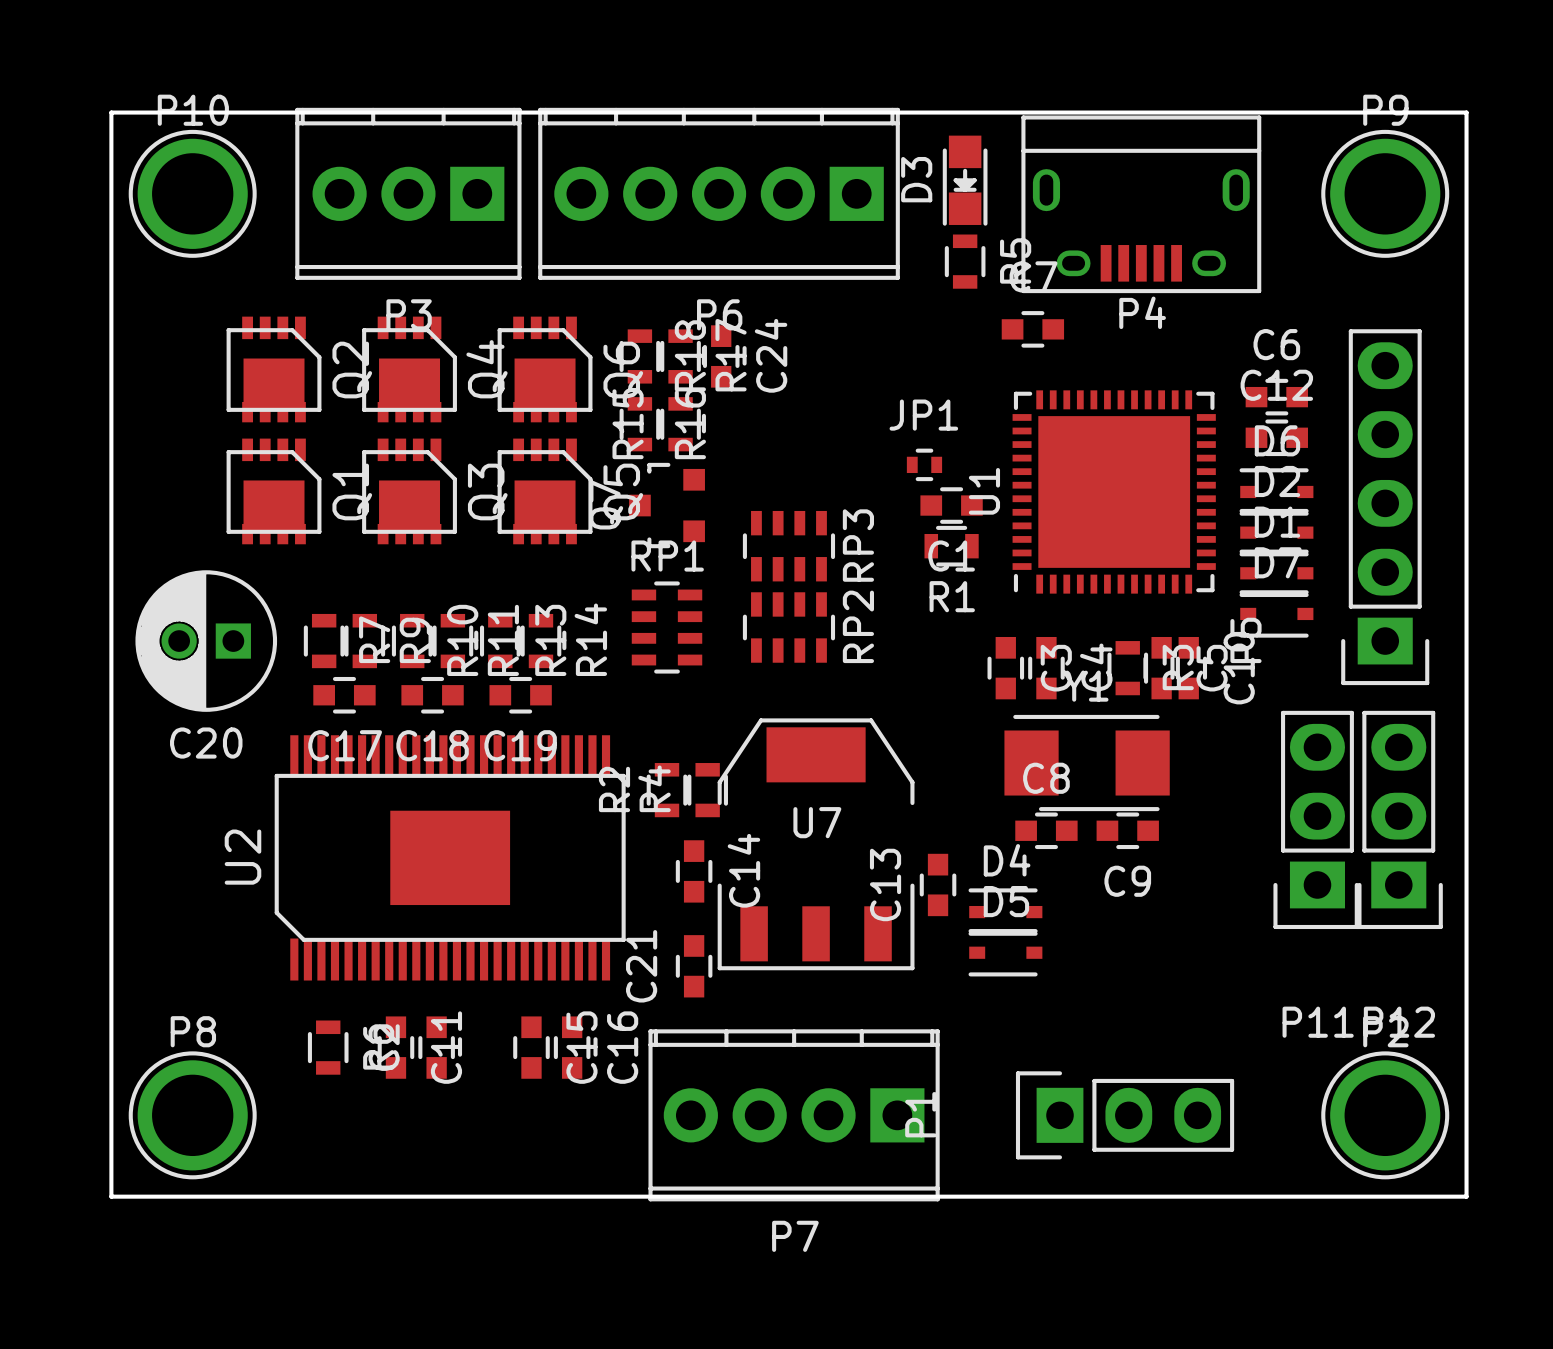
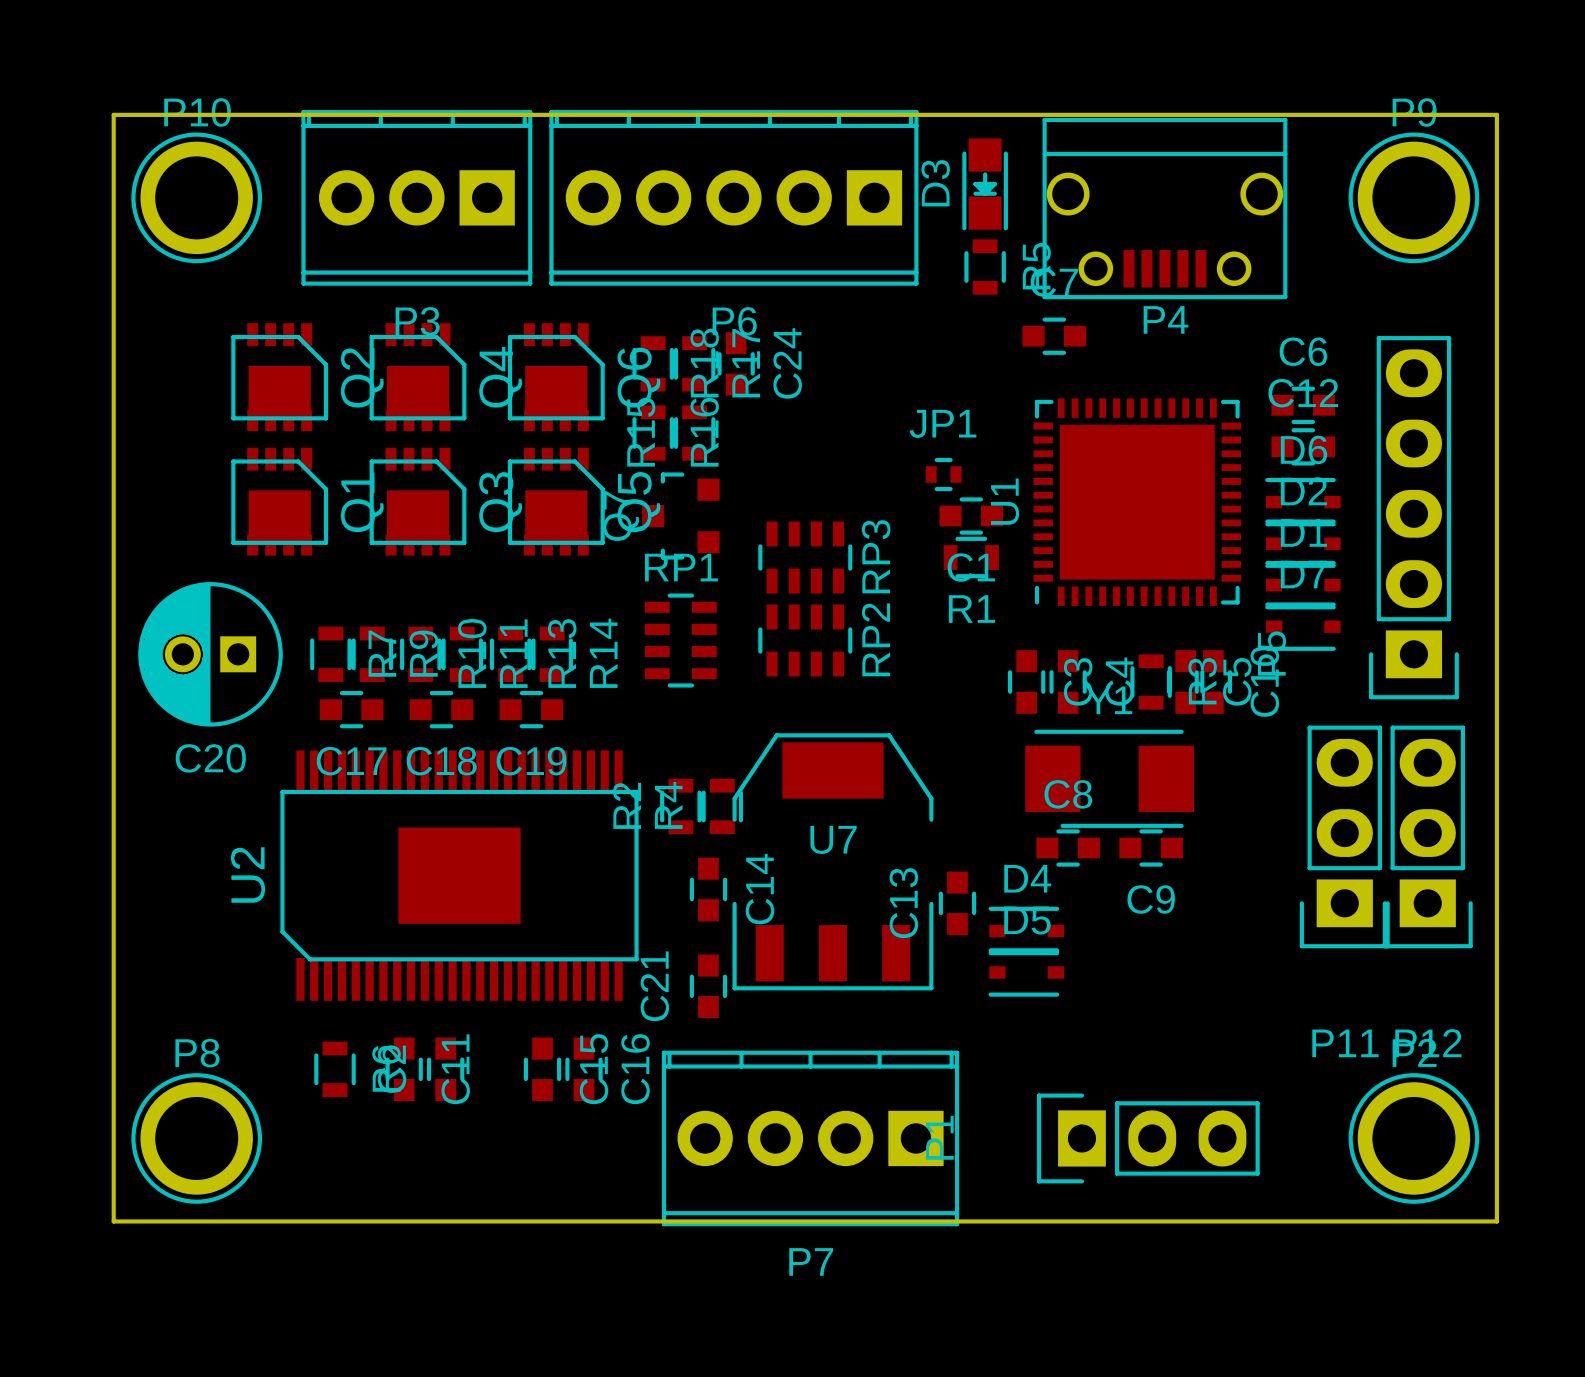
P4 footprint: [1021, 115, 1262, 294] -> [1042, 117, 1288, 300]

